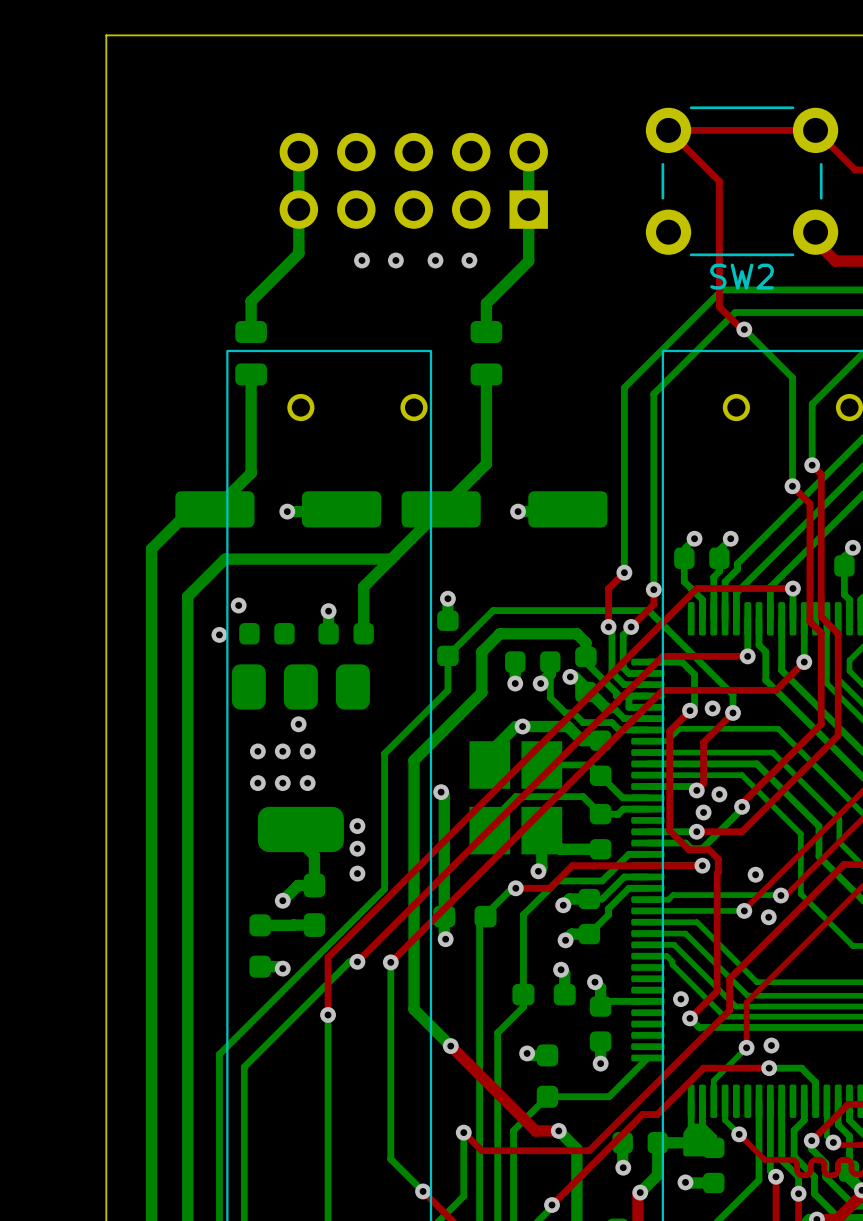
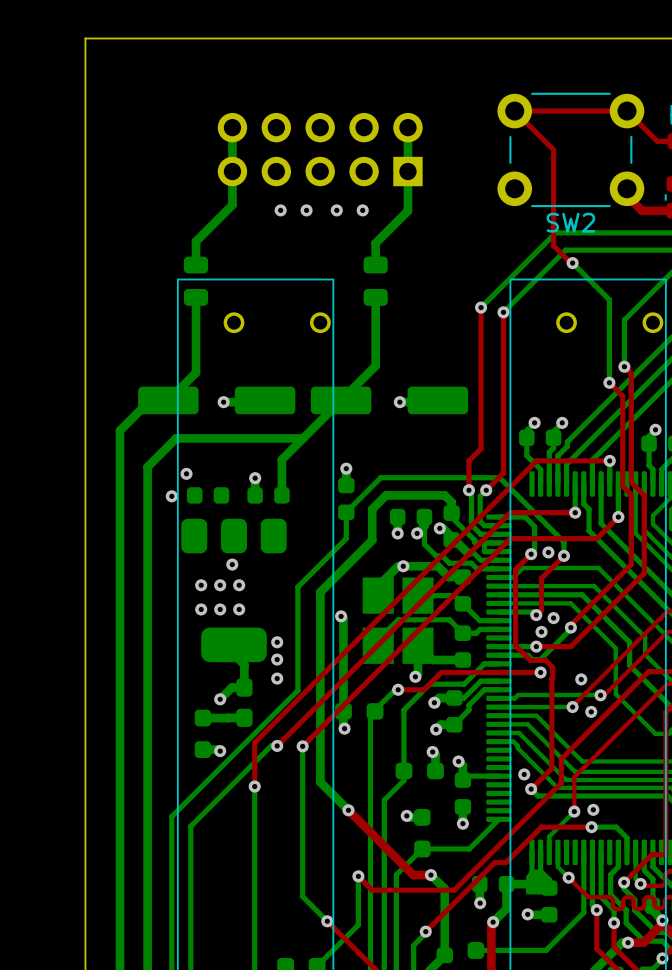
top track: none -> (481, 307) (481, 448)
bottom track: (624, 387) (624, 572) -> none
via: none -> (481, 307)
top track: none -> (503, 312) (503, 461)
bottom track: (653, 393) (653, 589) -> none
via: none -> (503, 312)
via: (624, 572) -> none
via: (653, 589) -> none

